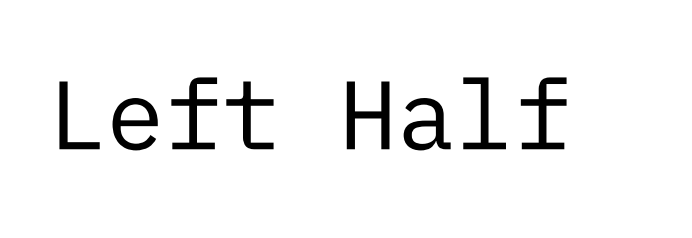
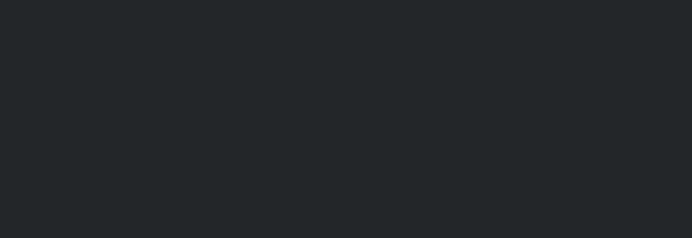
text: Left Half (313, 113) -> none

